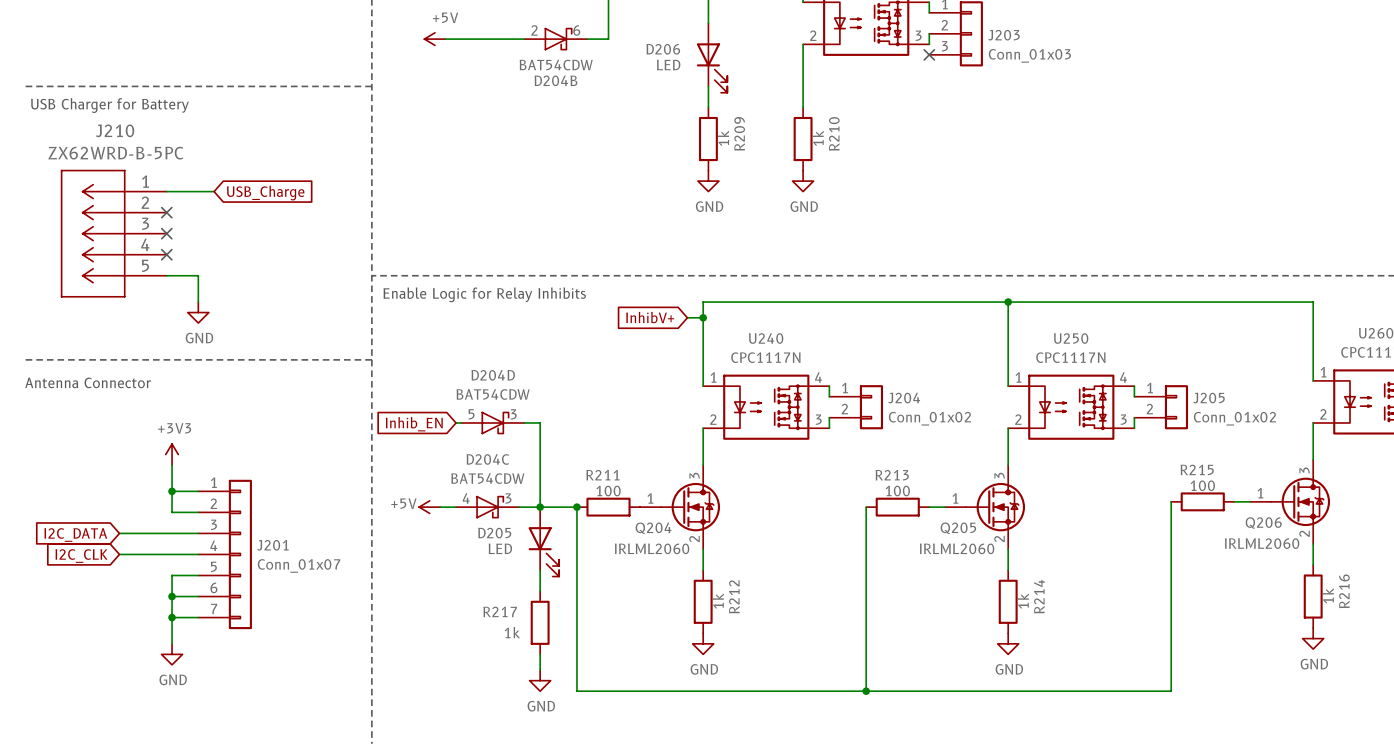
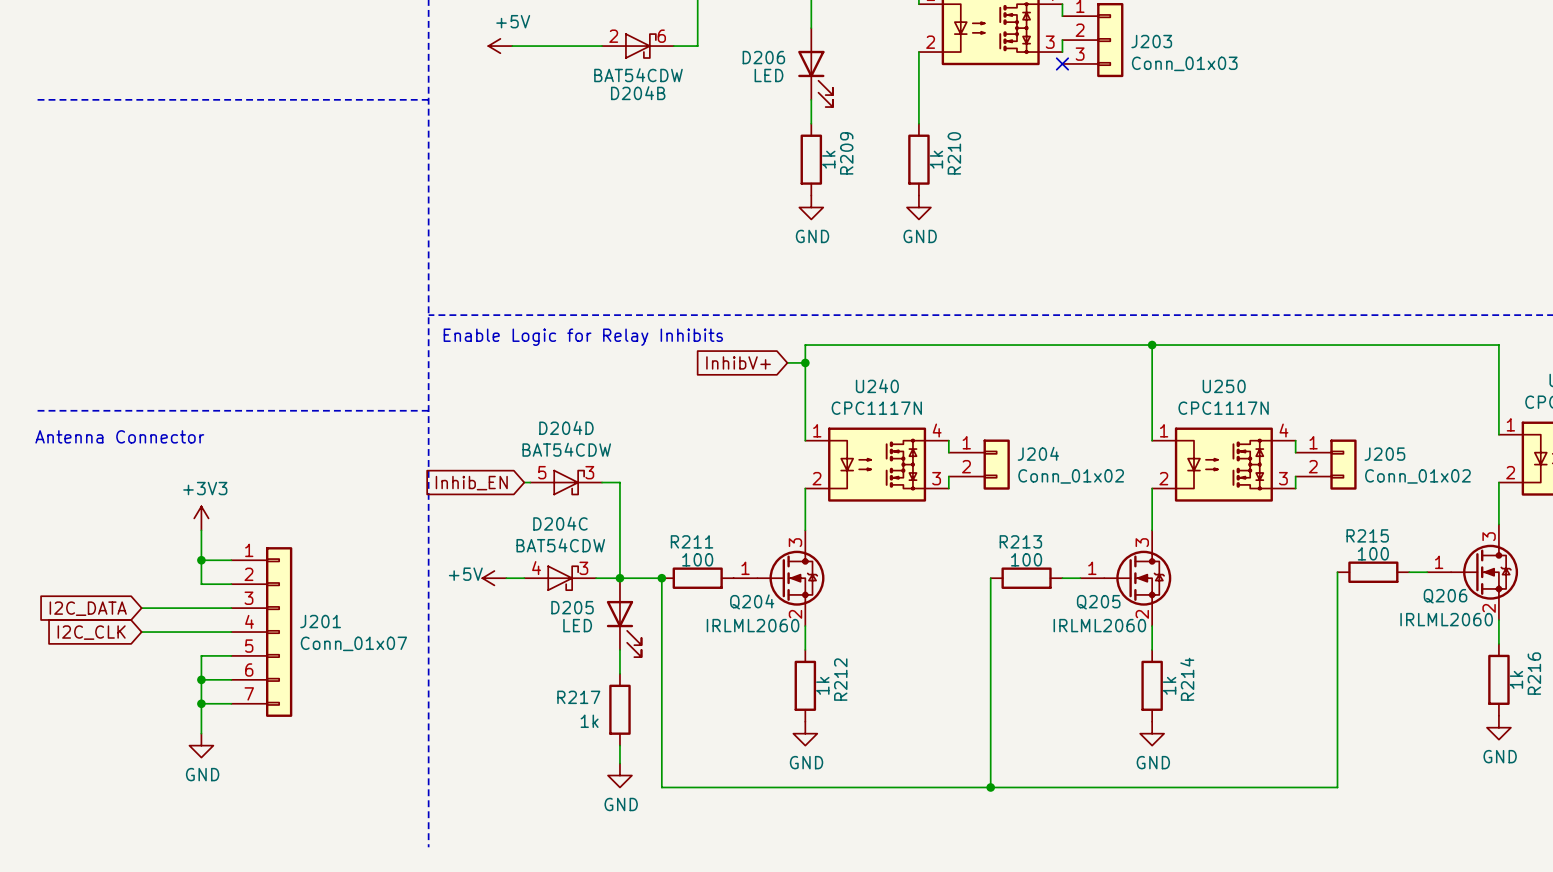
text: USB Charger for Battery (109, 105) -> none
wire: (166, 191) (214, 191) -> none
global label: USB_Charge (265, 193) -> none
no-connect mark: (166, 212) -> none
J210: ZX62WRD-B-5PC (113, 233) -> none
no-connect mark: (166, 233) -> none
no-connect mark: (166, 254) -> none
wire: (166, 275) (198, 275) (198, 302) -> none
power symbol: GND (198, 312) -> none

